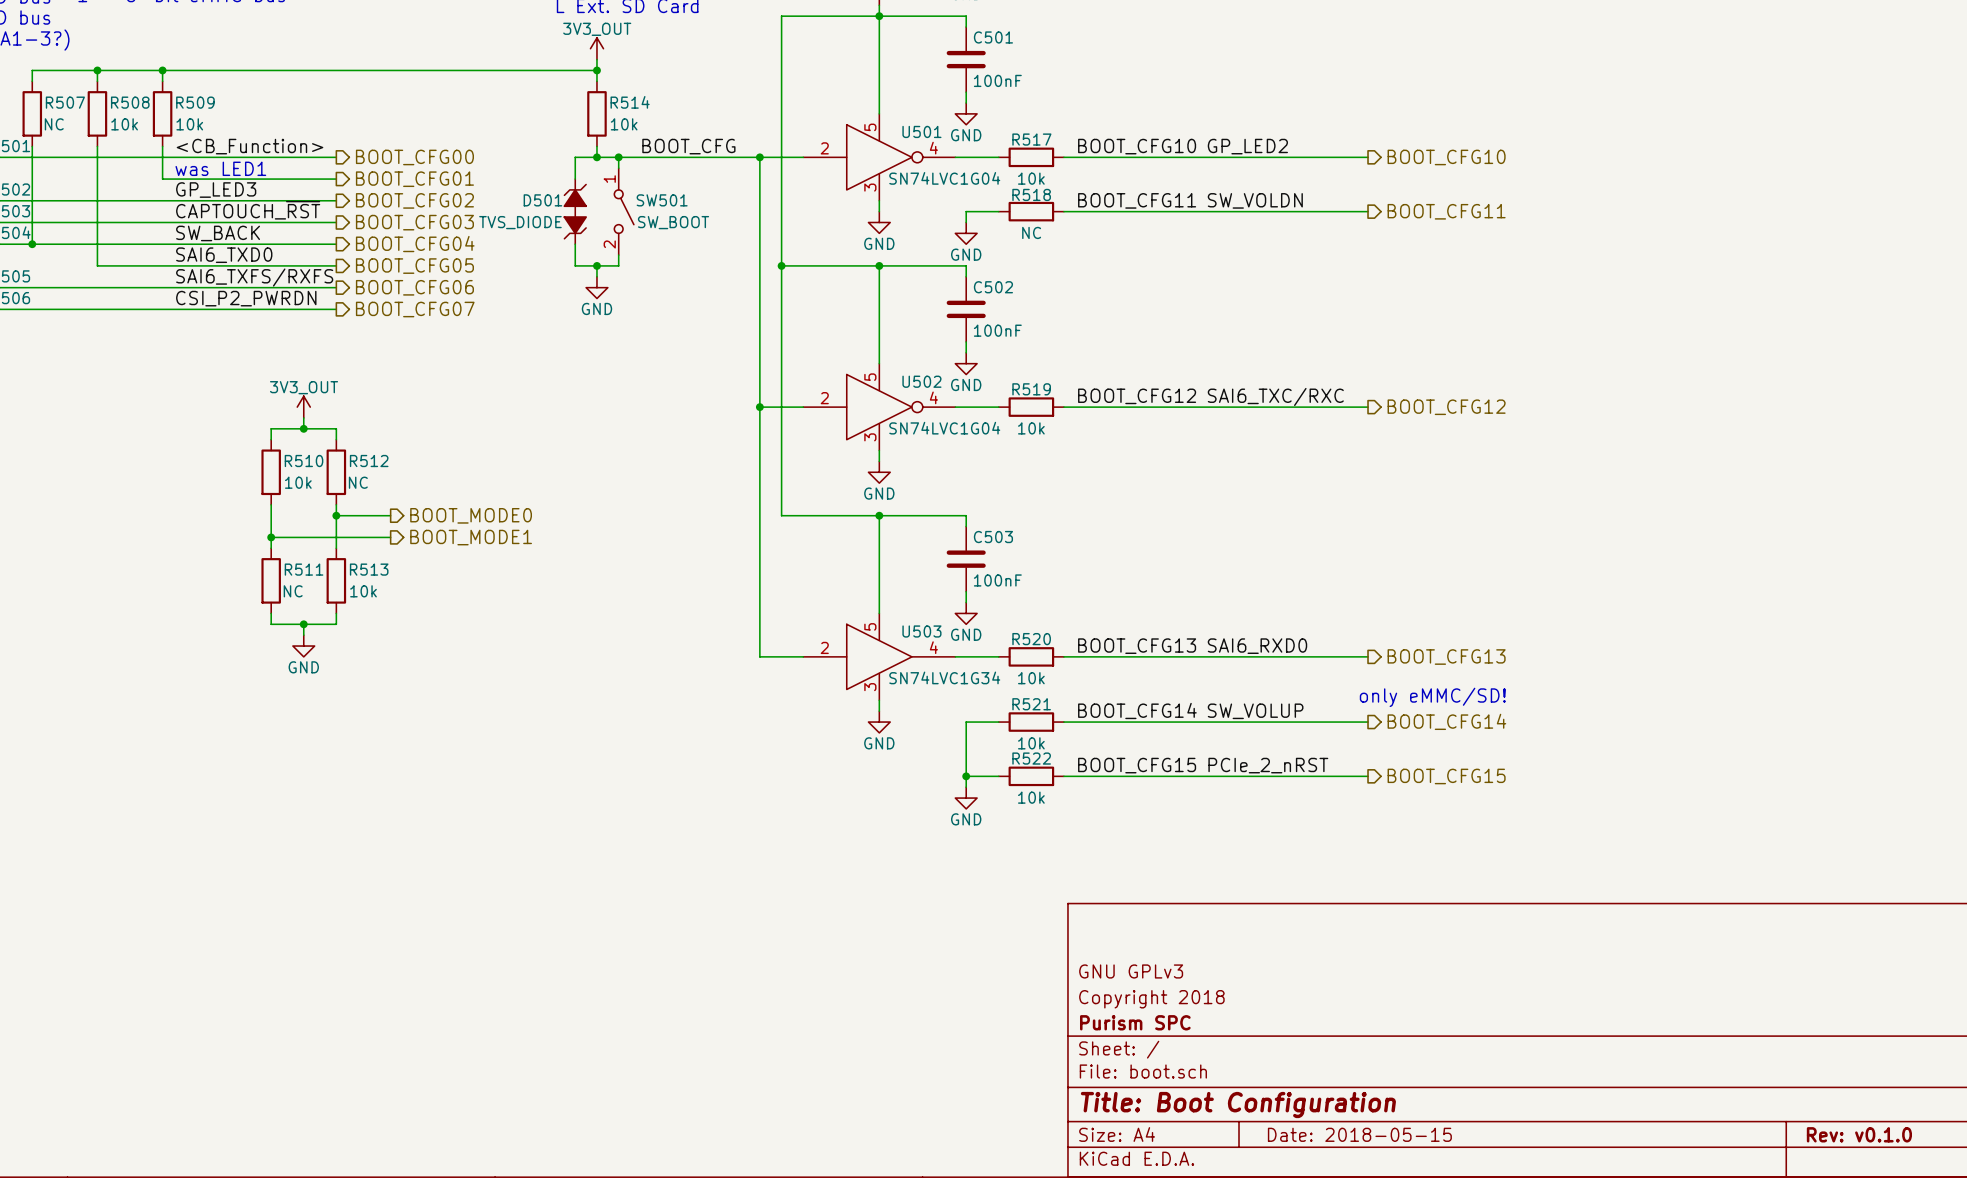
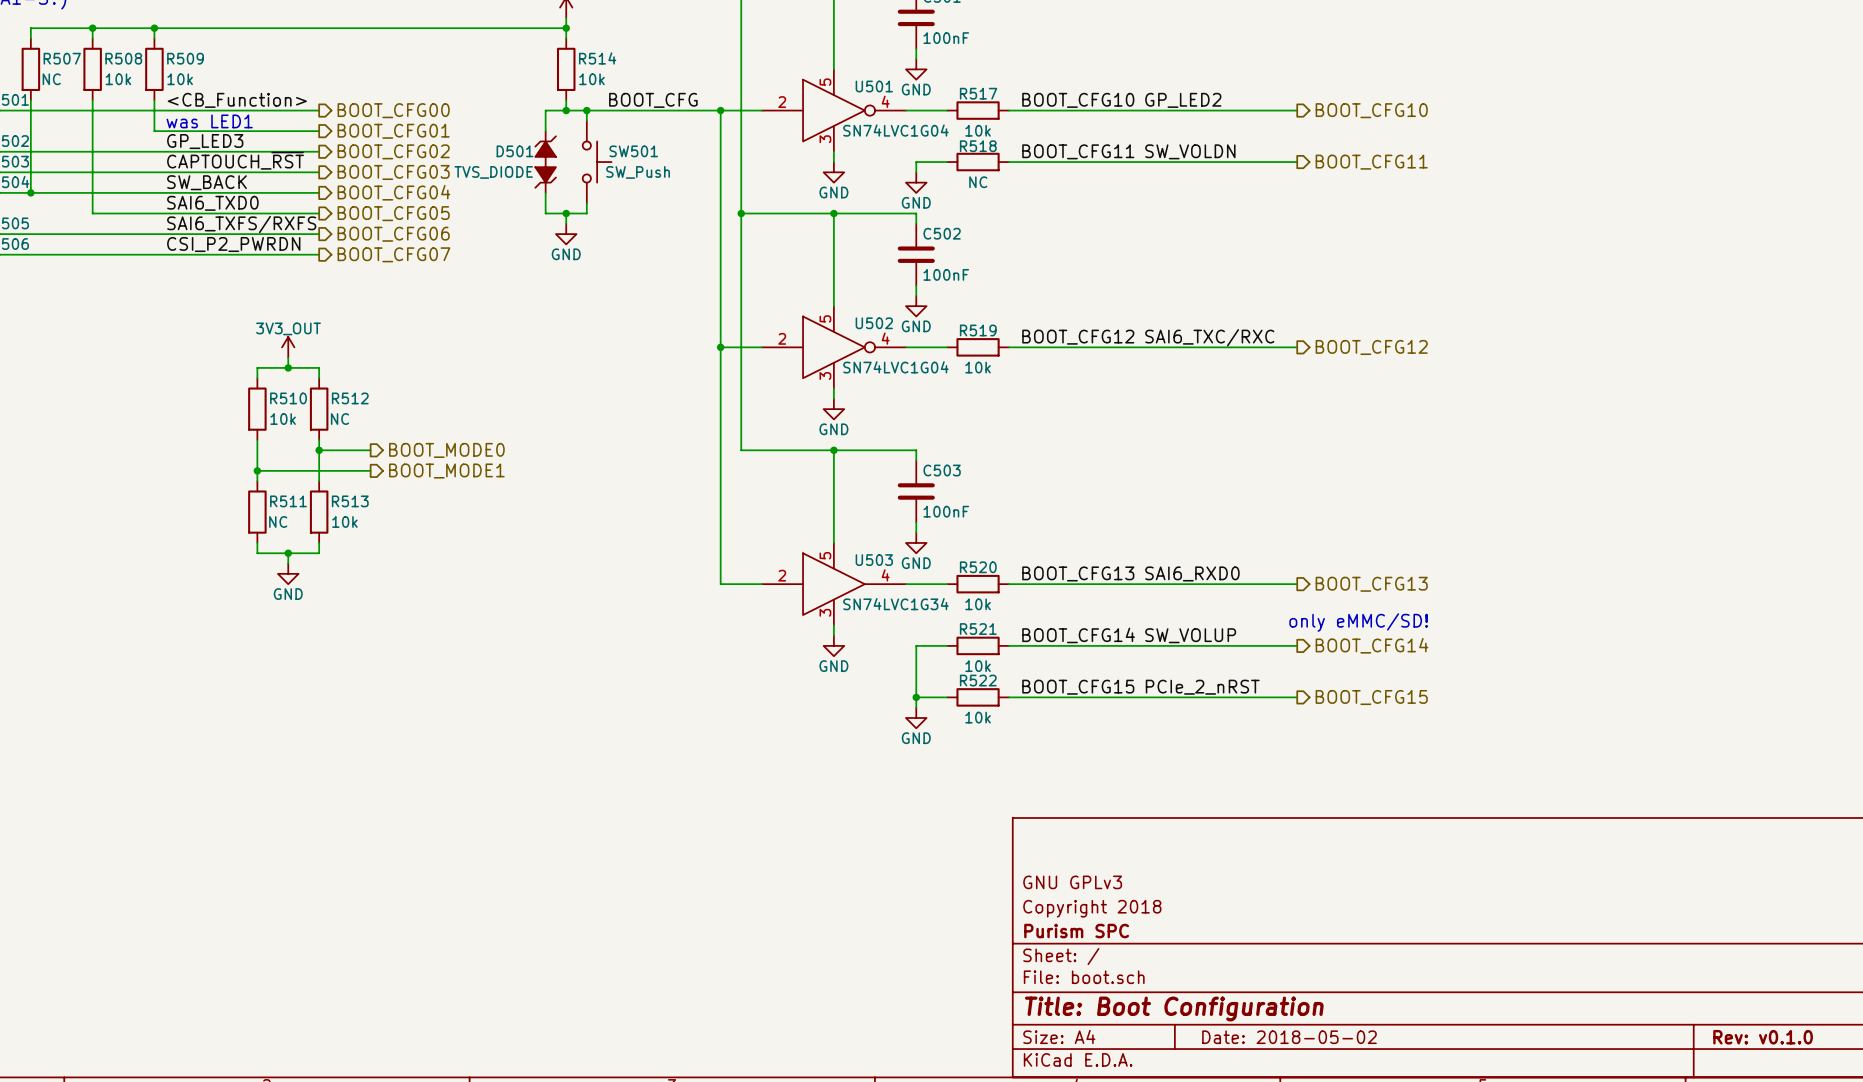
SW501 symbol: [614, 168, 634, 256] -> [582, 120, 612, 204]
SW501 value: SW_BOOT (673, 222) -> SW_Push (638, 172)
title block: Date: 2018-05-15 (1359, 1134) -> Date: 2018-05-02 (1289, 1037)

